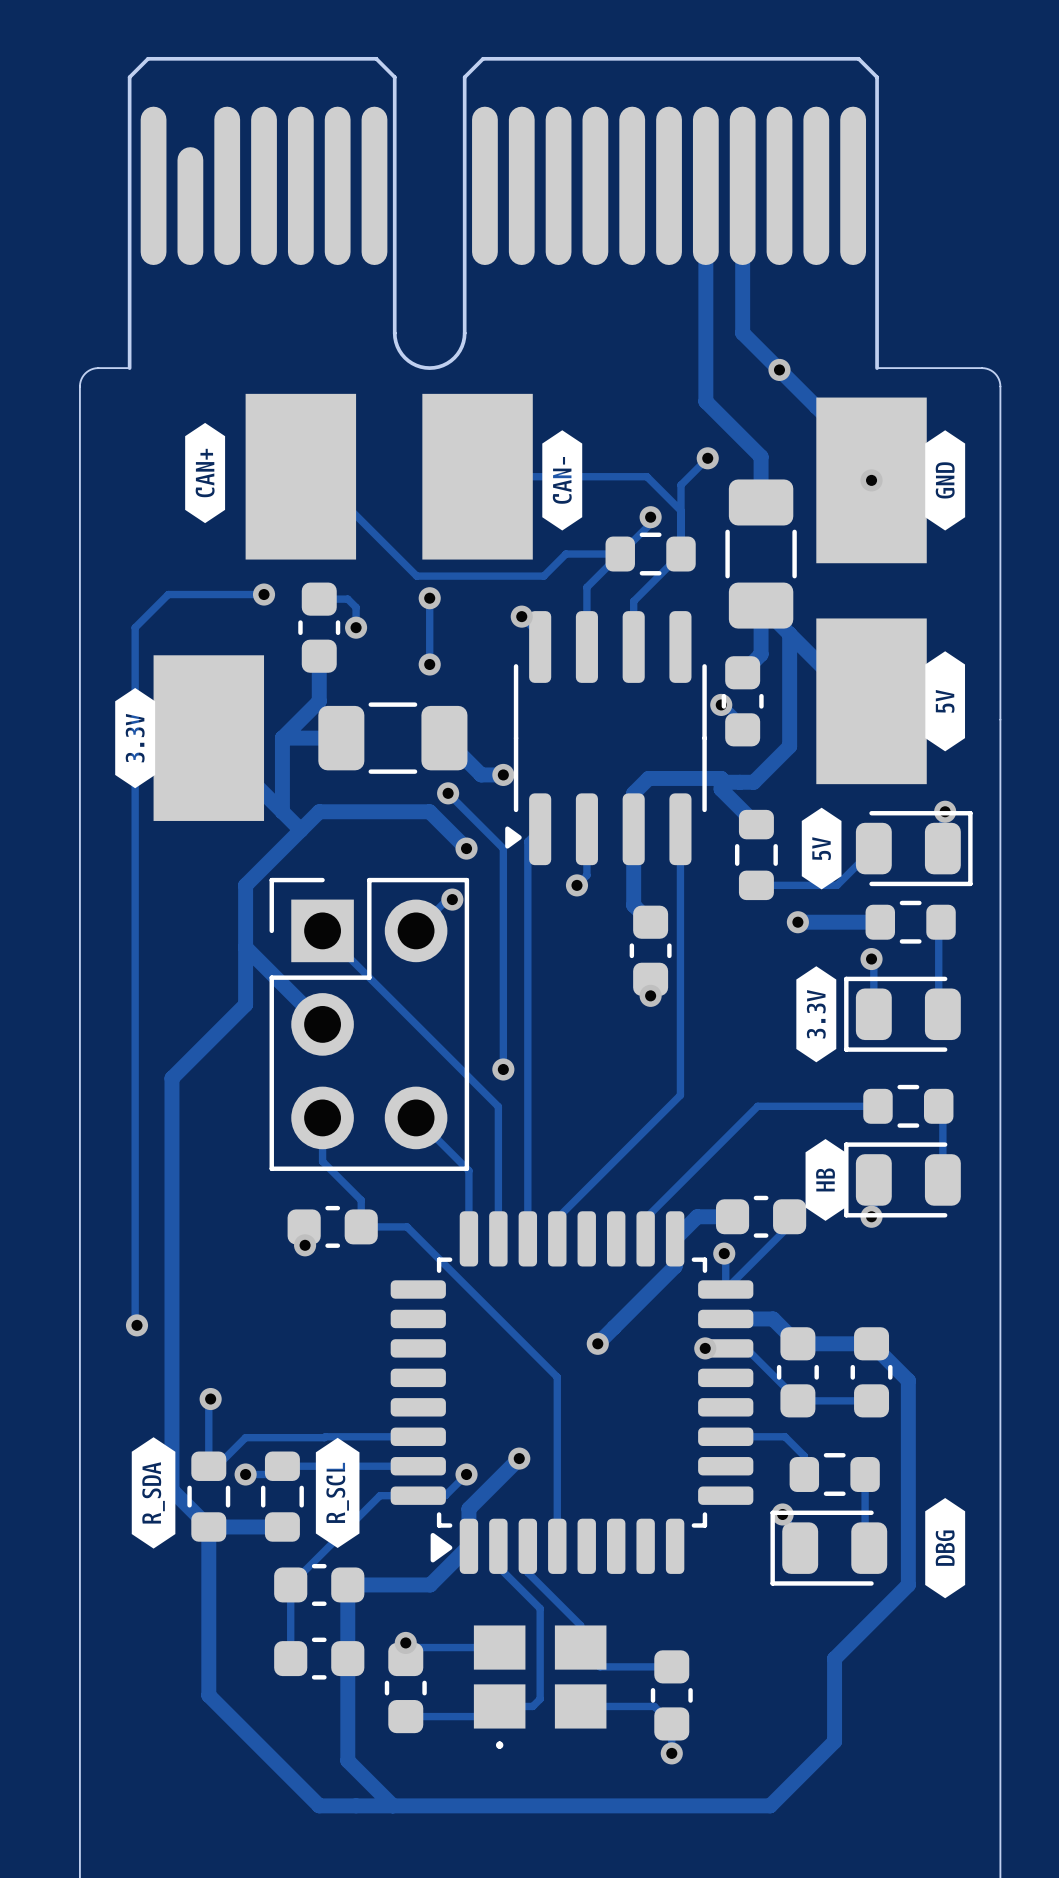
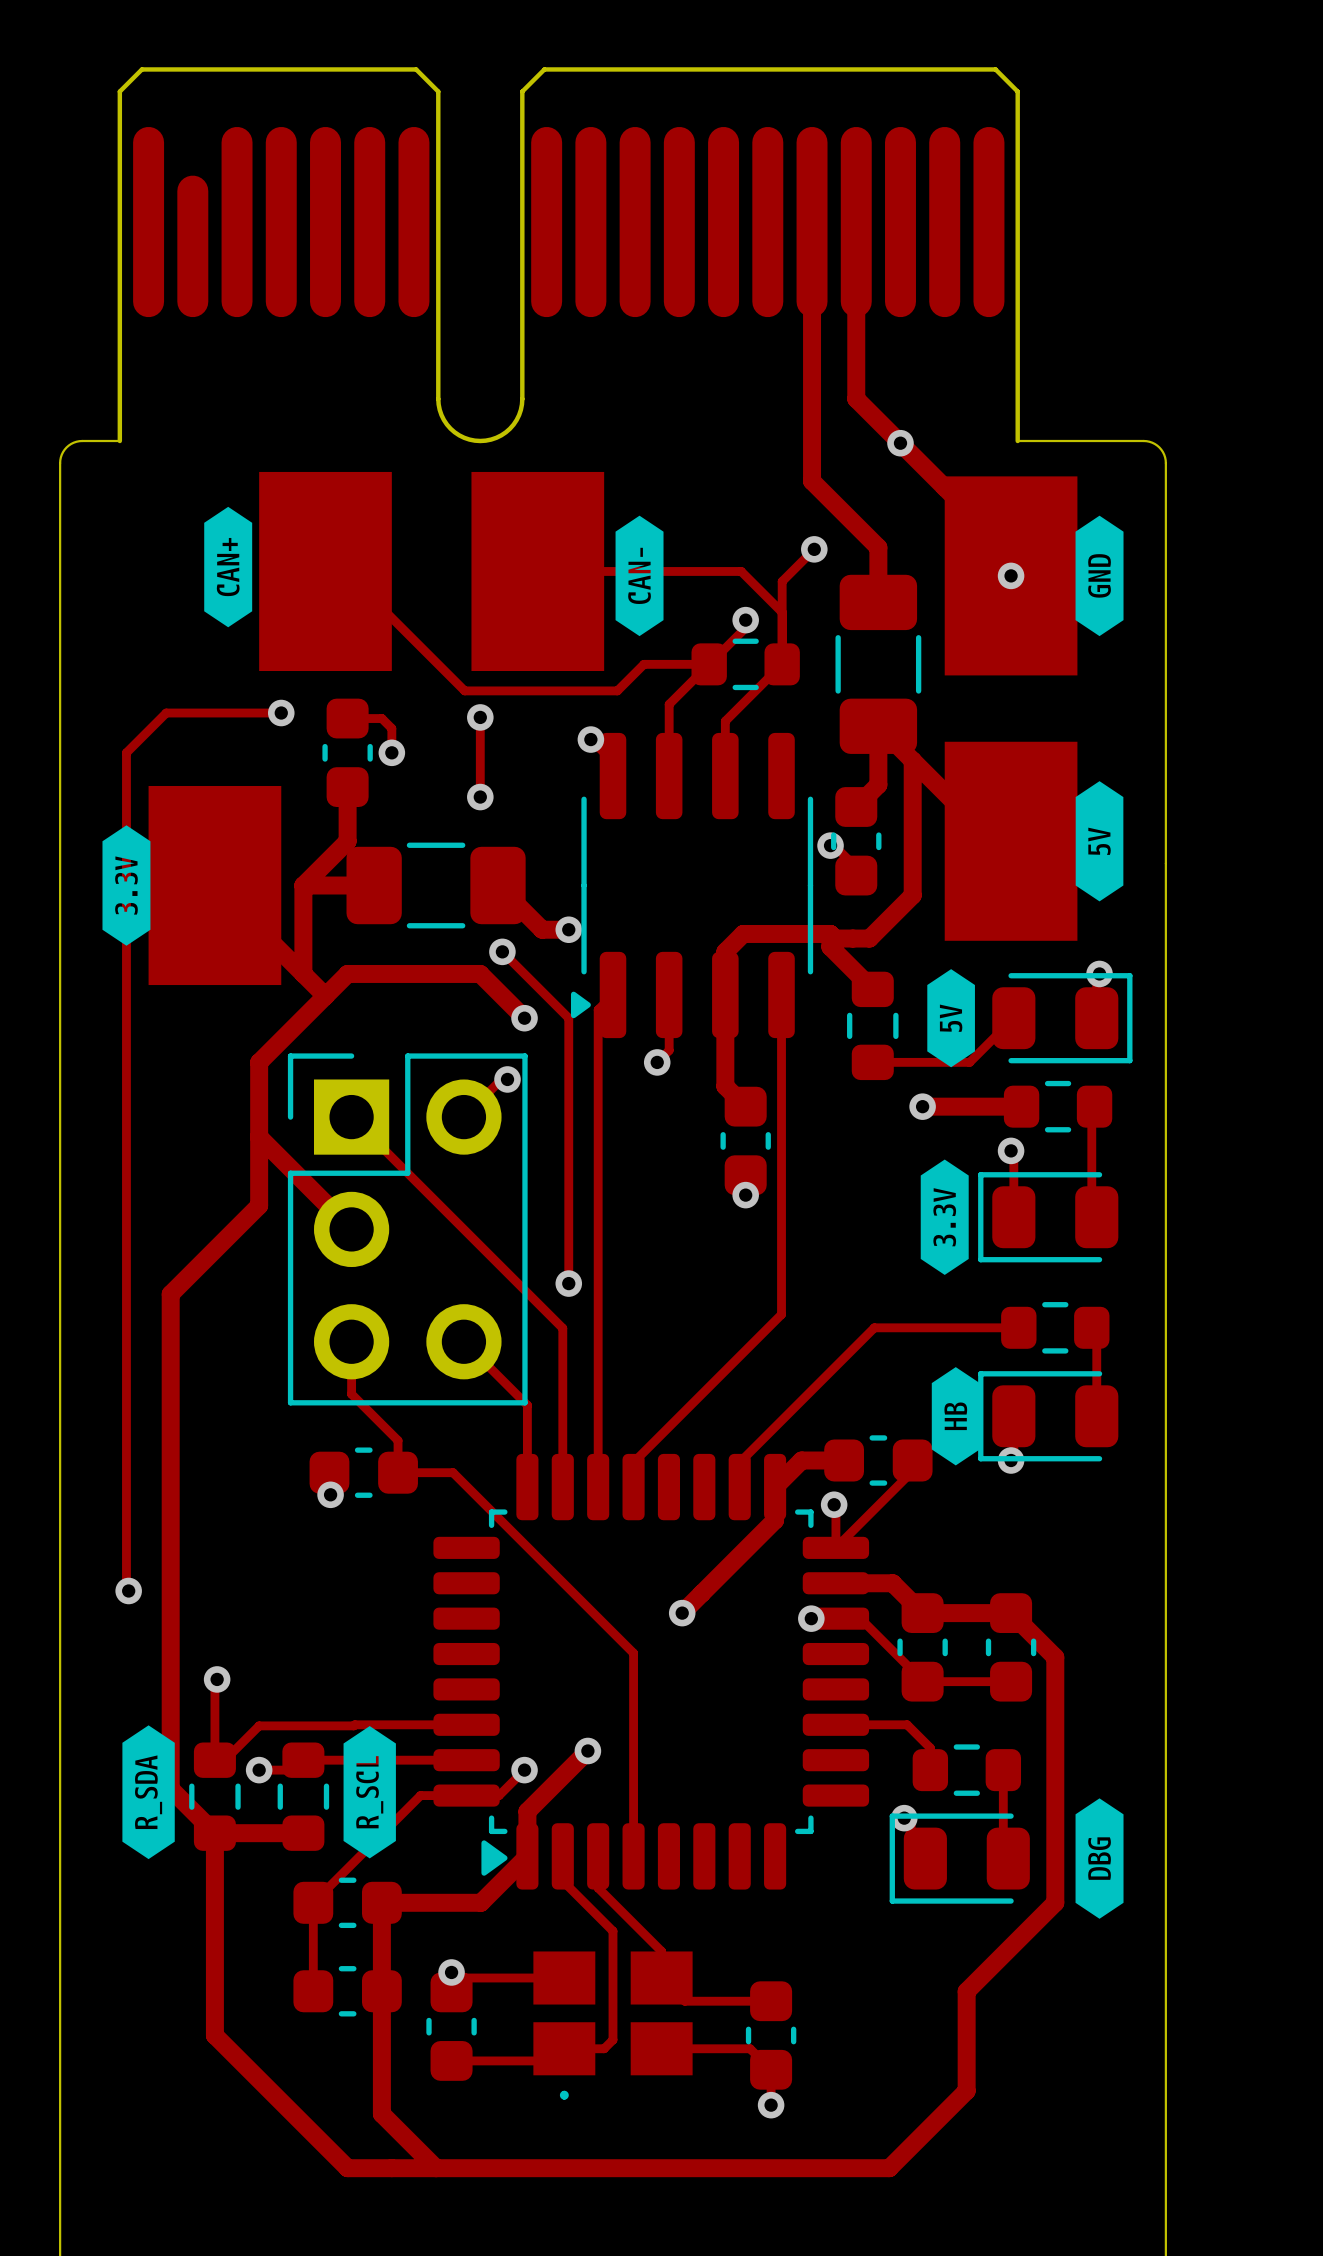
drawing position: (205, 473) -> (228, 567)

